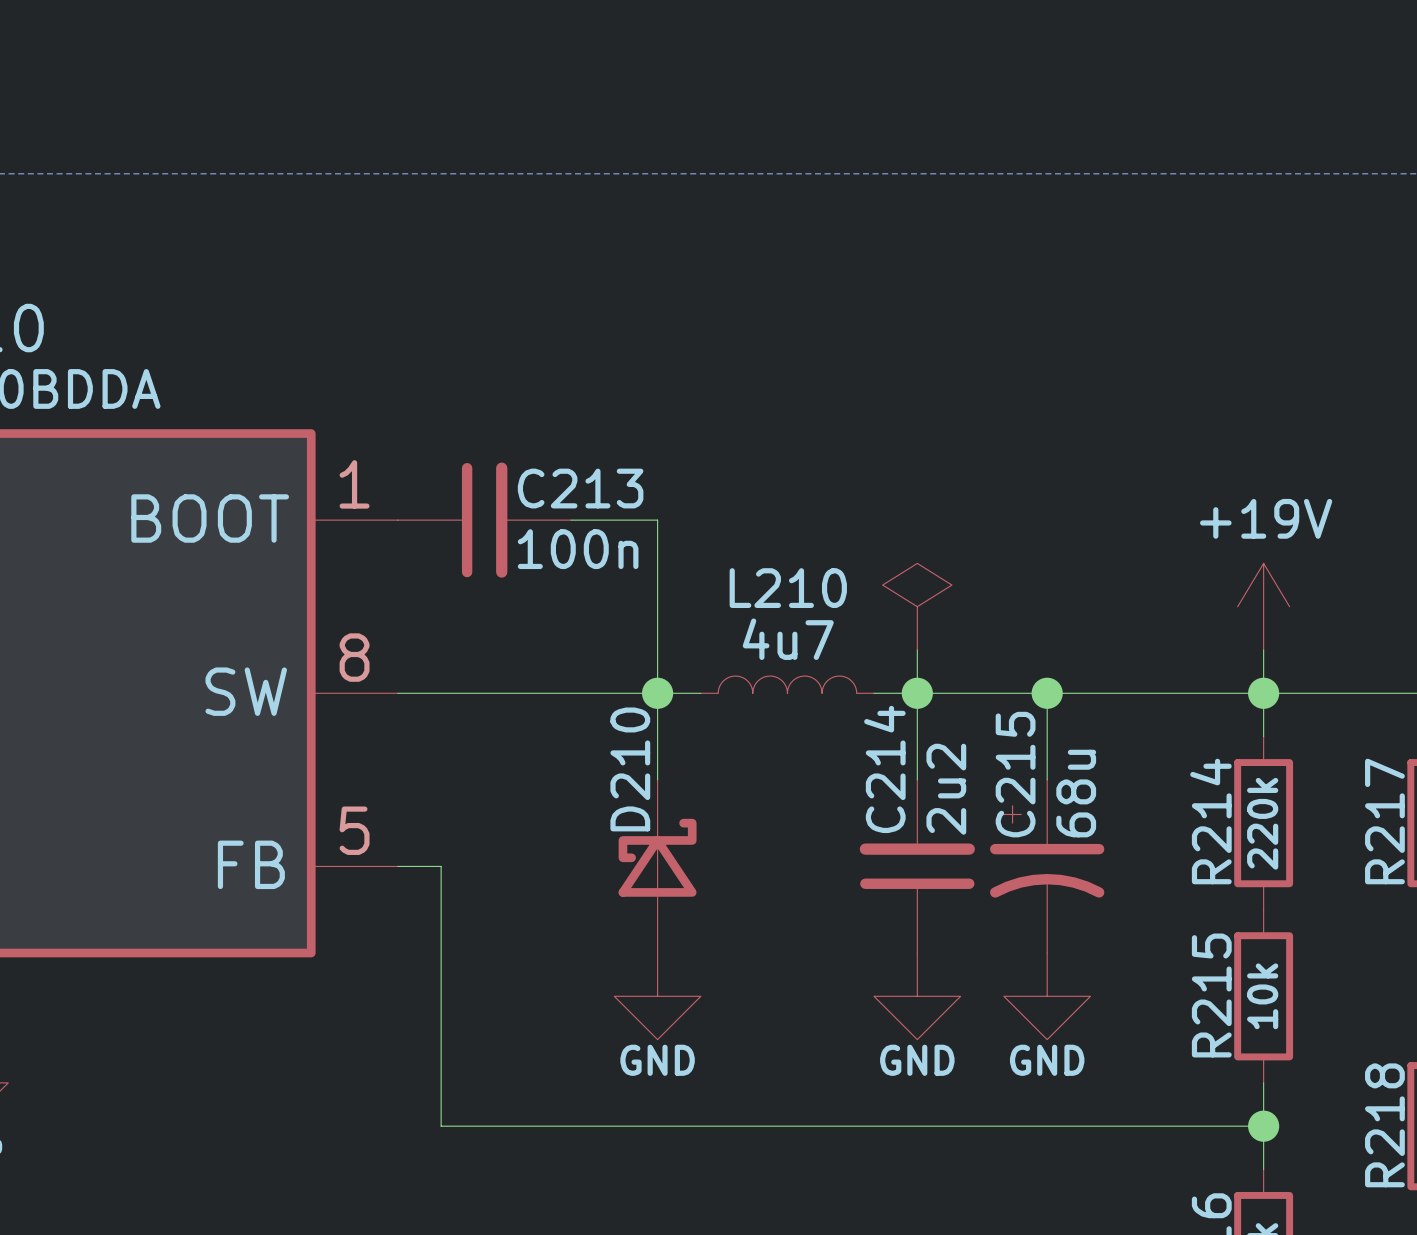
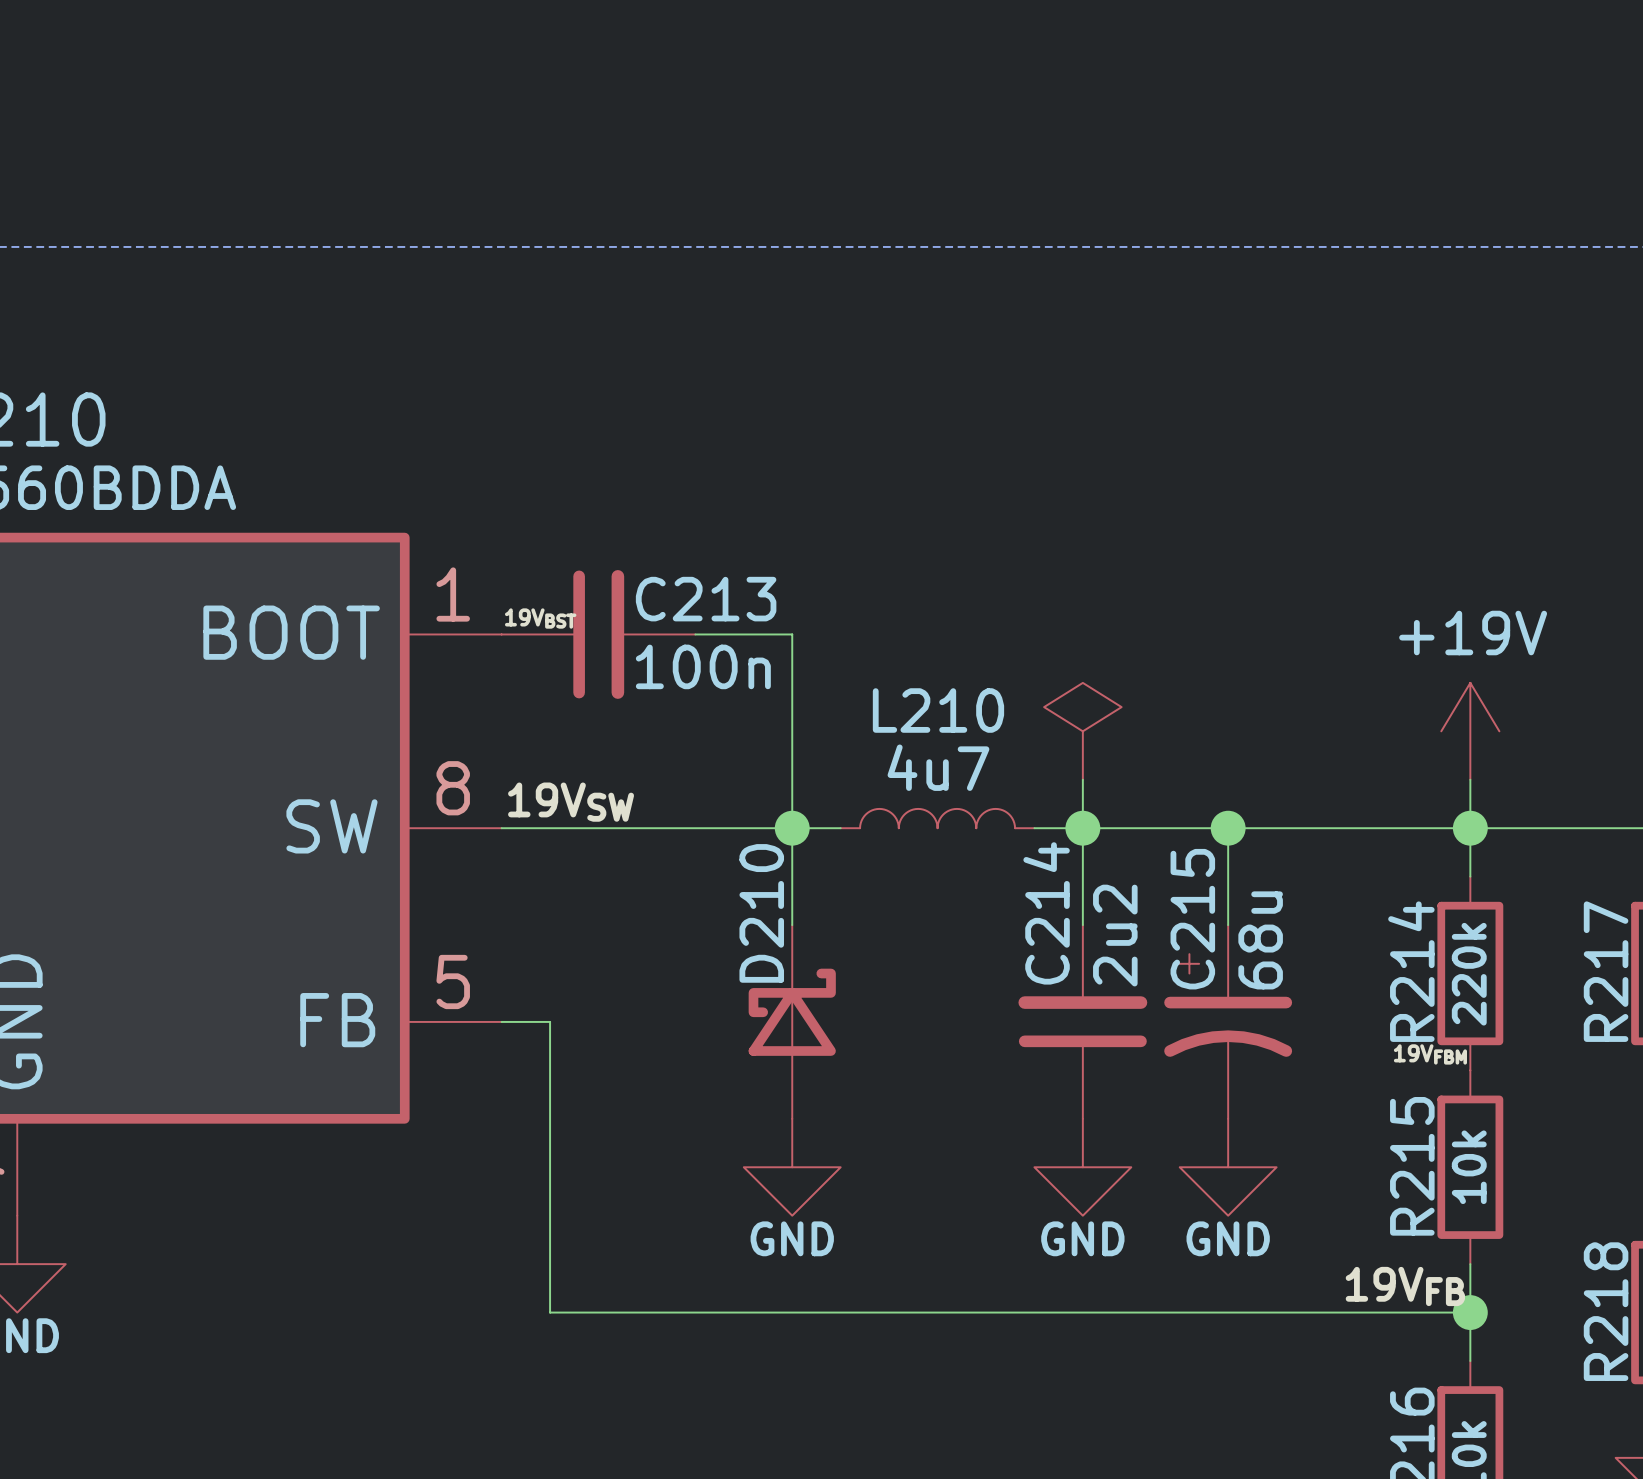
label: none -> 19VBST (540, 618)
label: none -> 19VSW (571, 802)
label: none -> 19VFBM (1430, 1054)
label: none -> 19VFB (1405, 1286)

